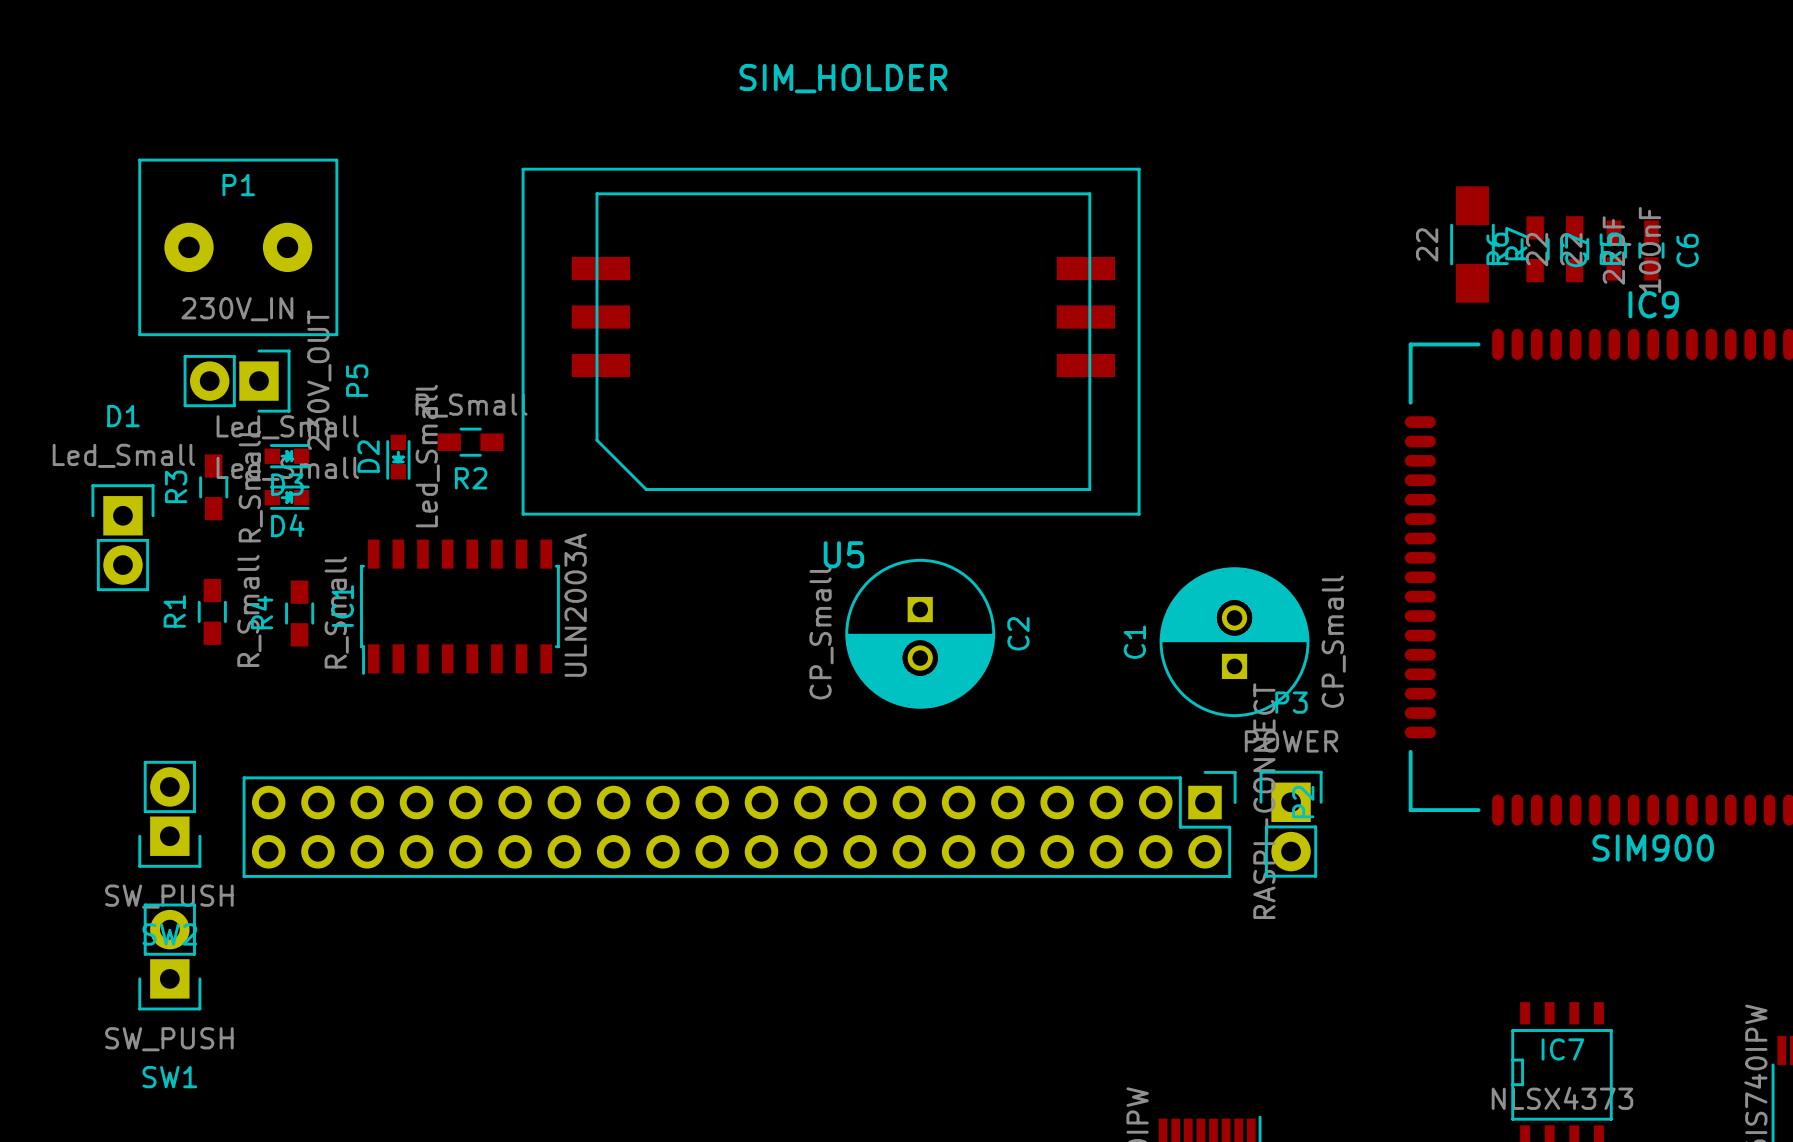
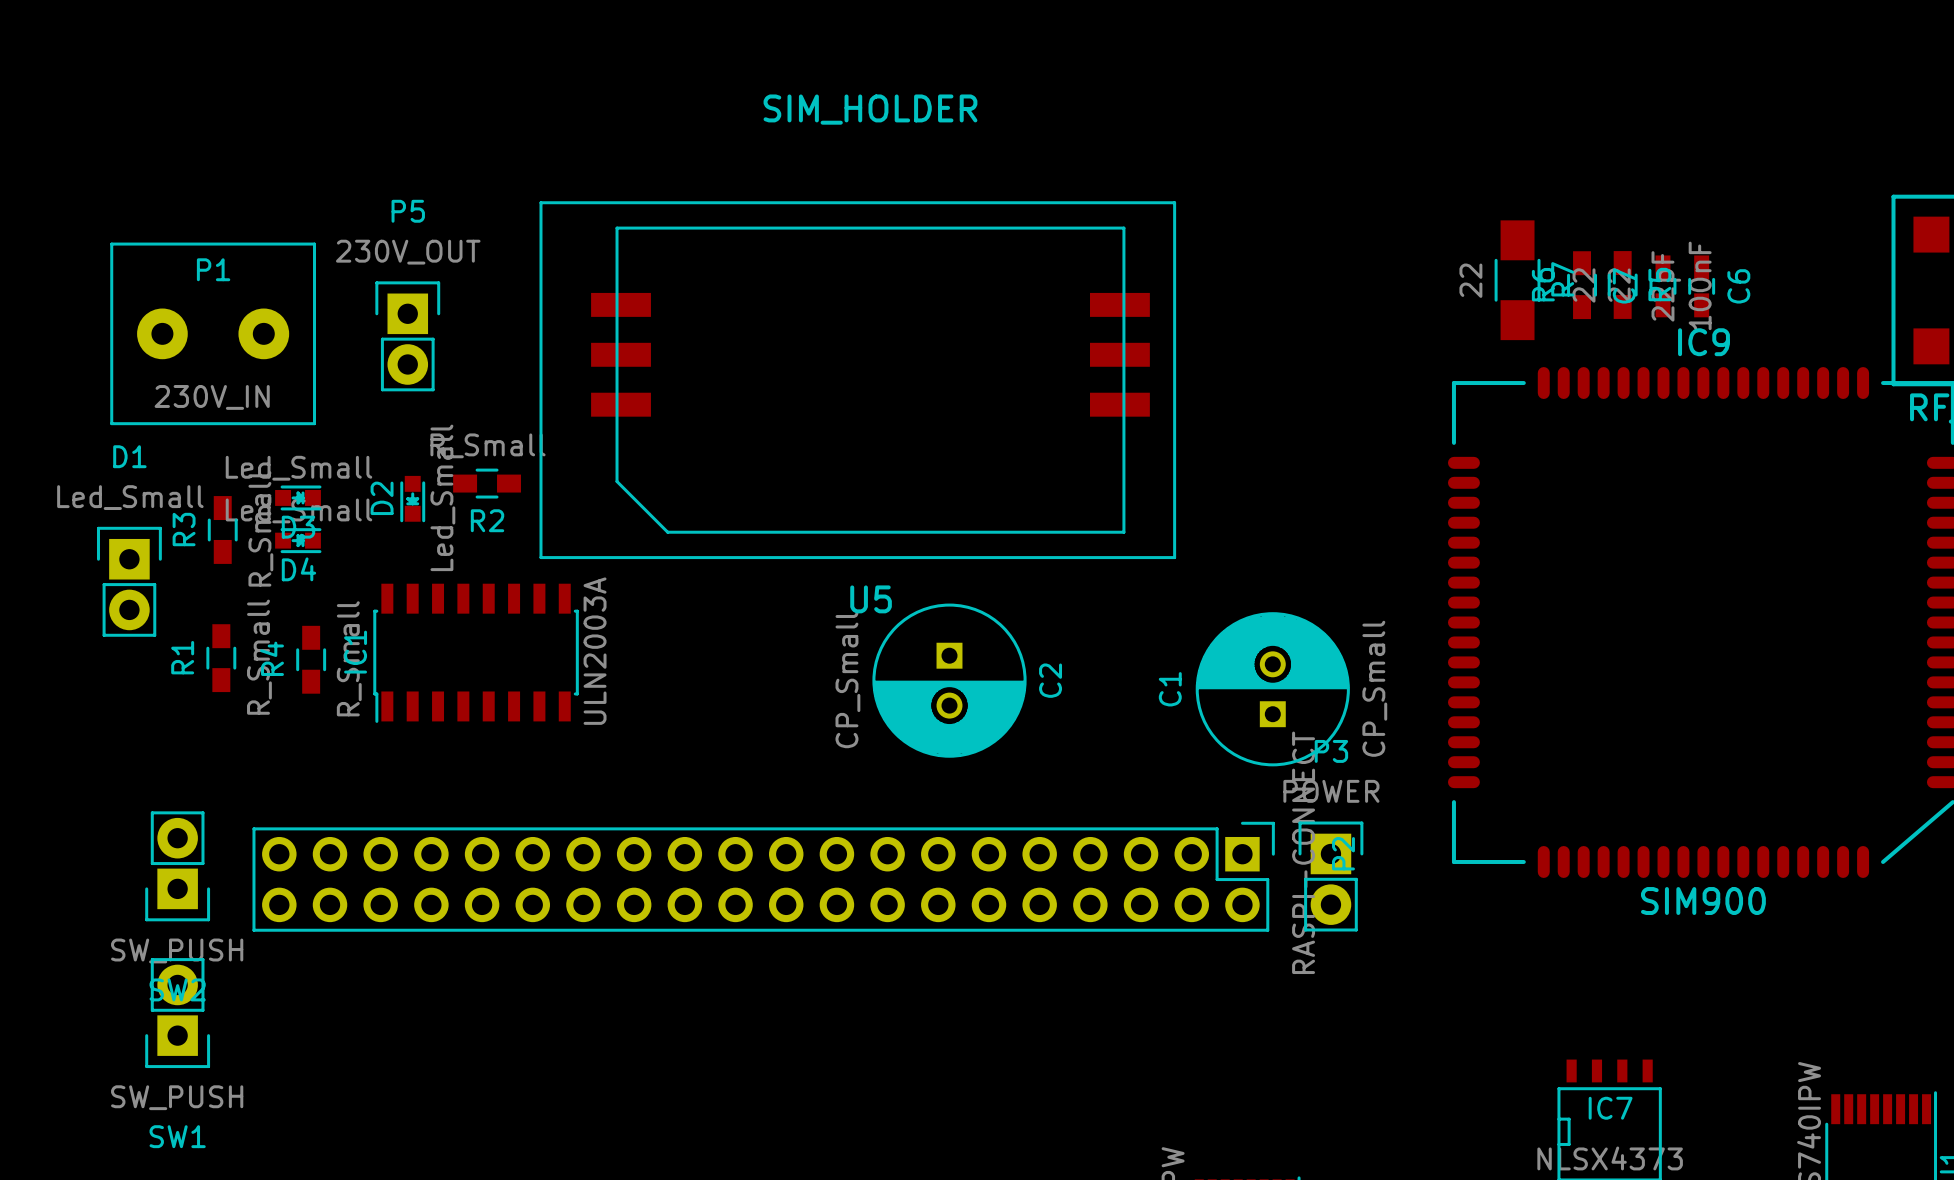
P1 position: (238, 247) -> (213, 333)
P5 rotation: 0° (237, 381) -> 90° counterclockwise (407, 336)
P5 position: (237, 381) -> (407, 336)

